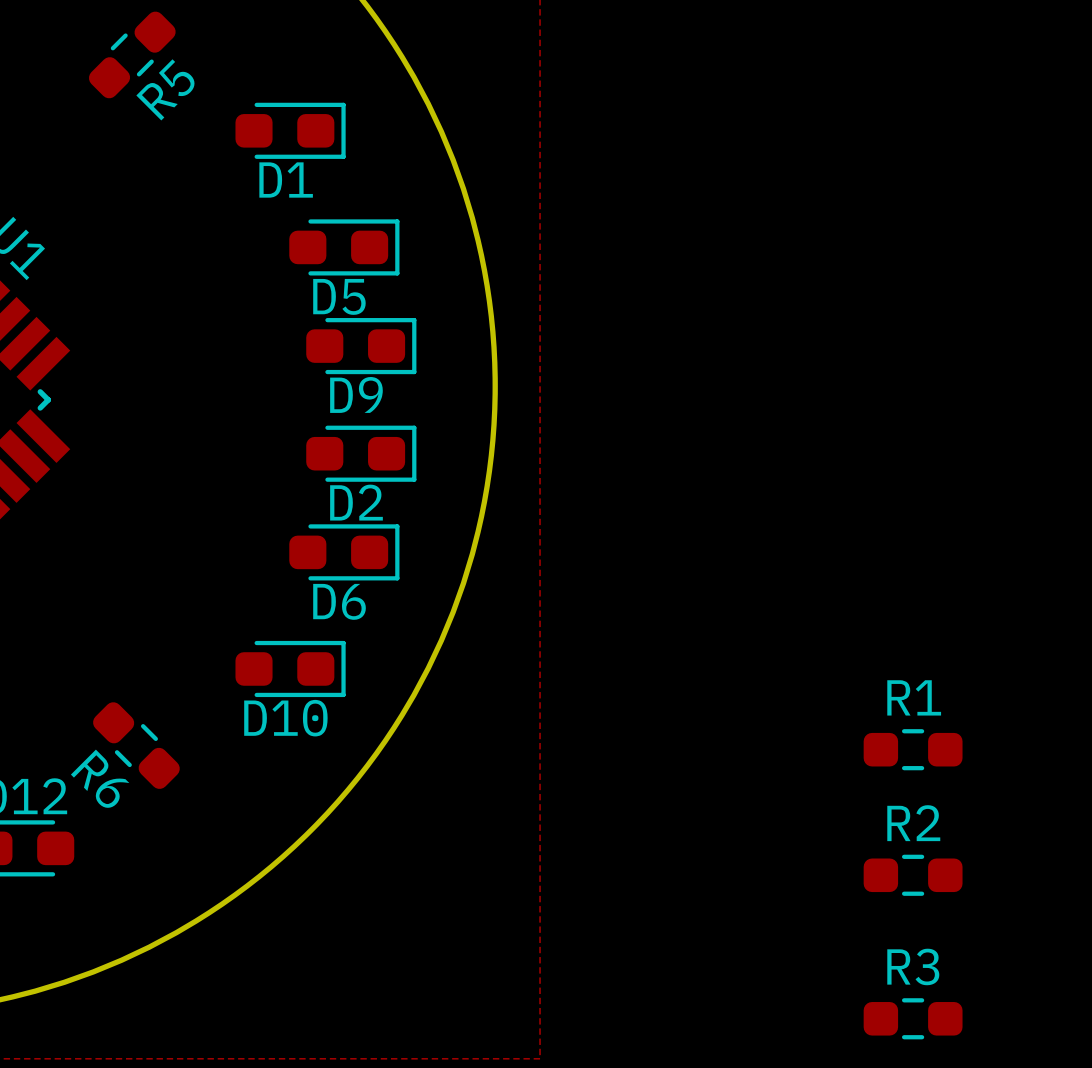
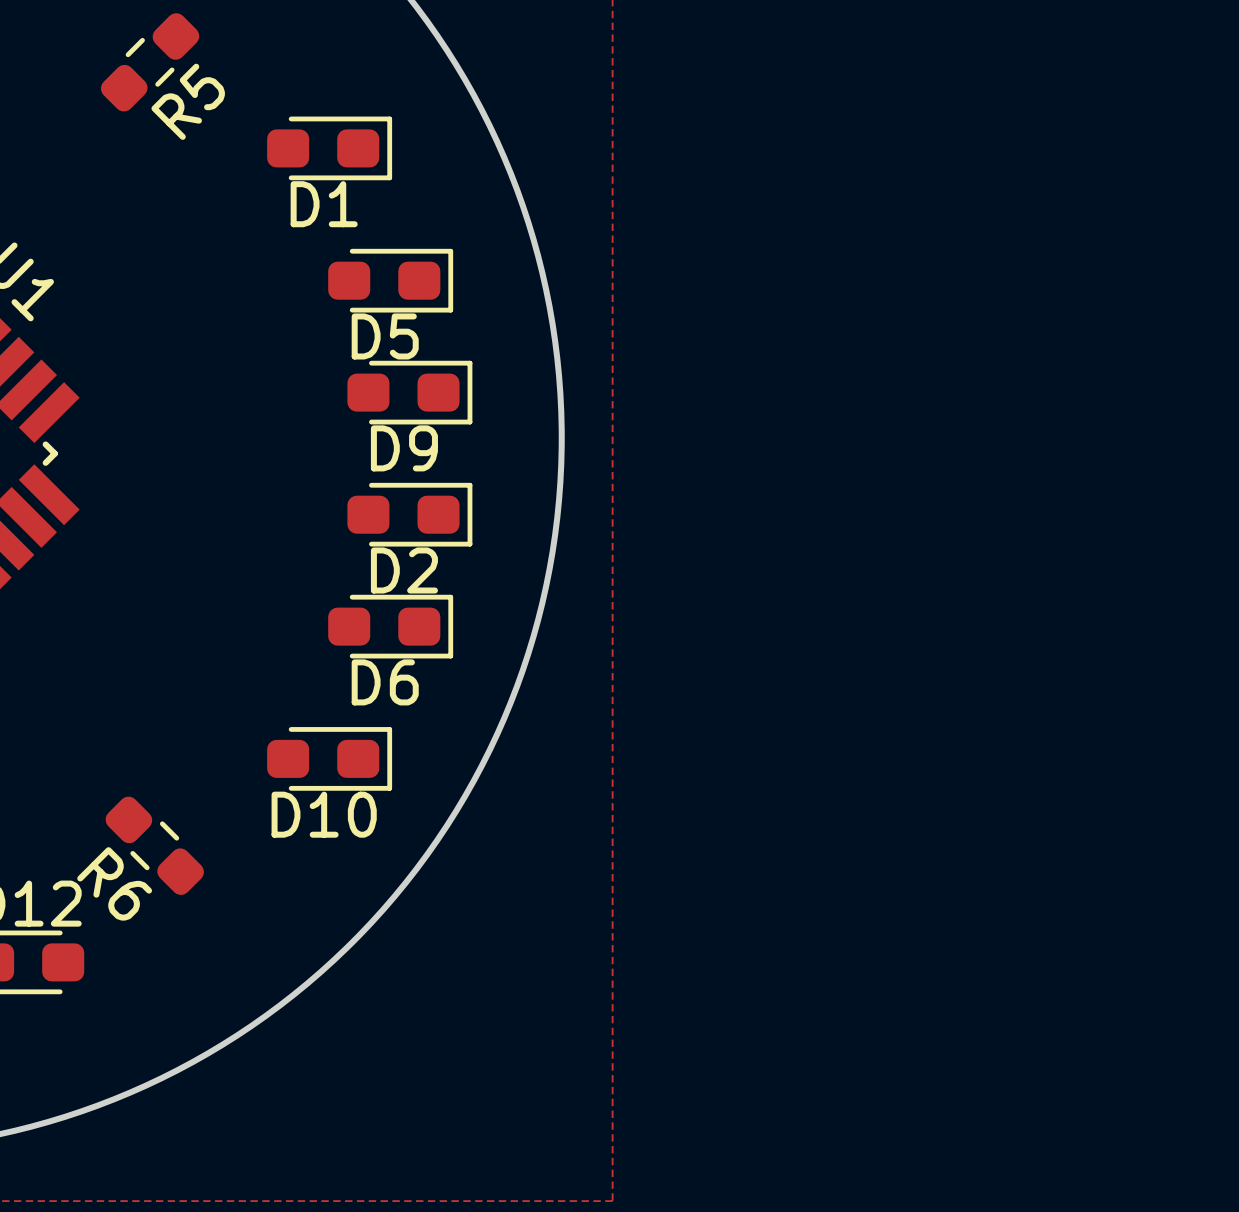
R1: (913, 749) -> none
R2: (913, 875) -> none
R3: (913, 1018) -> none

